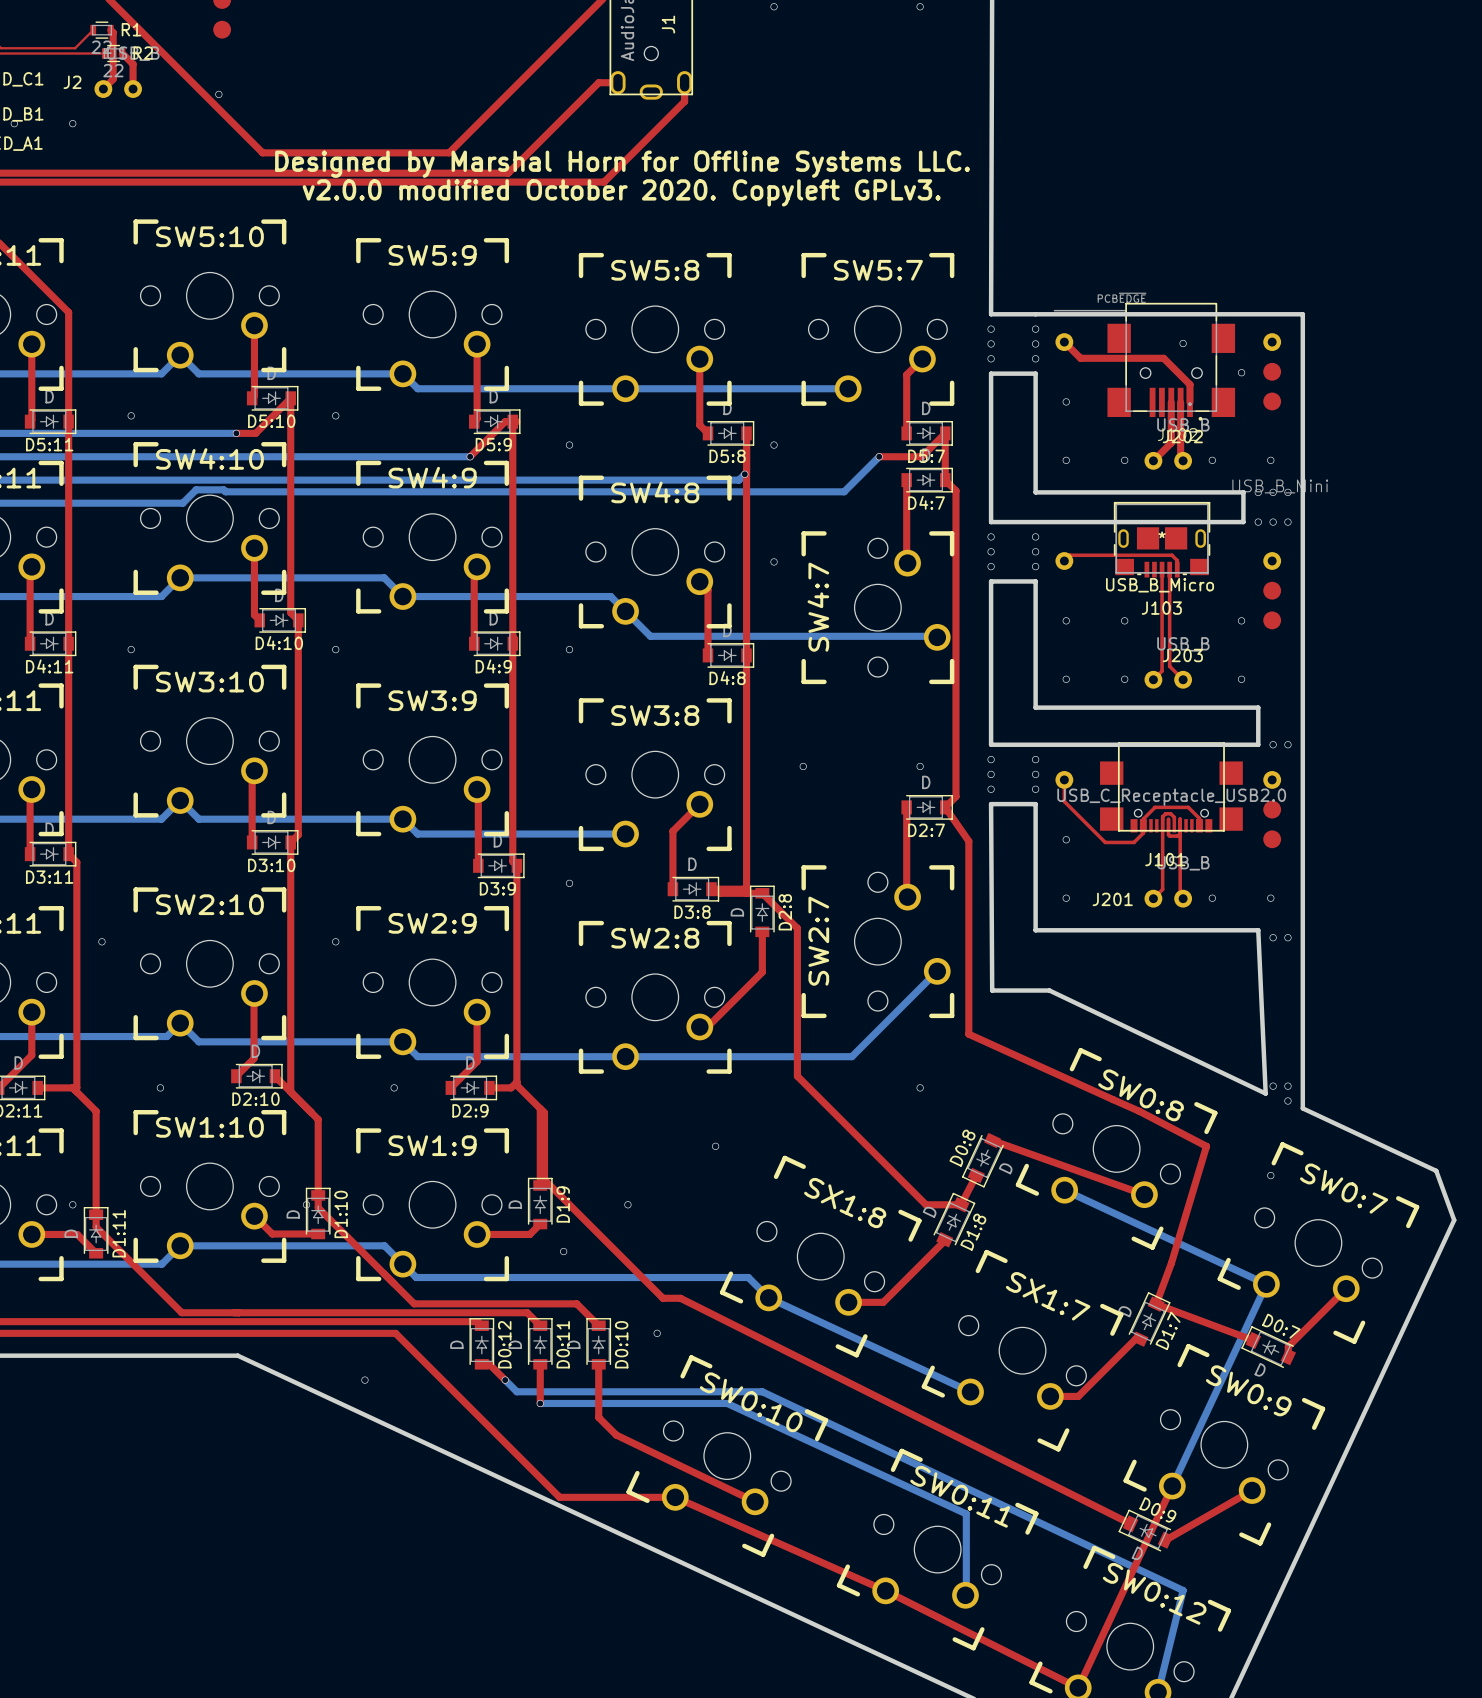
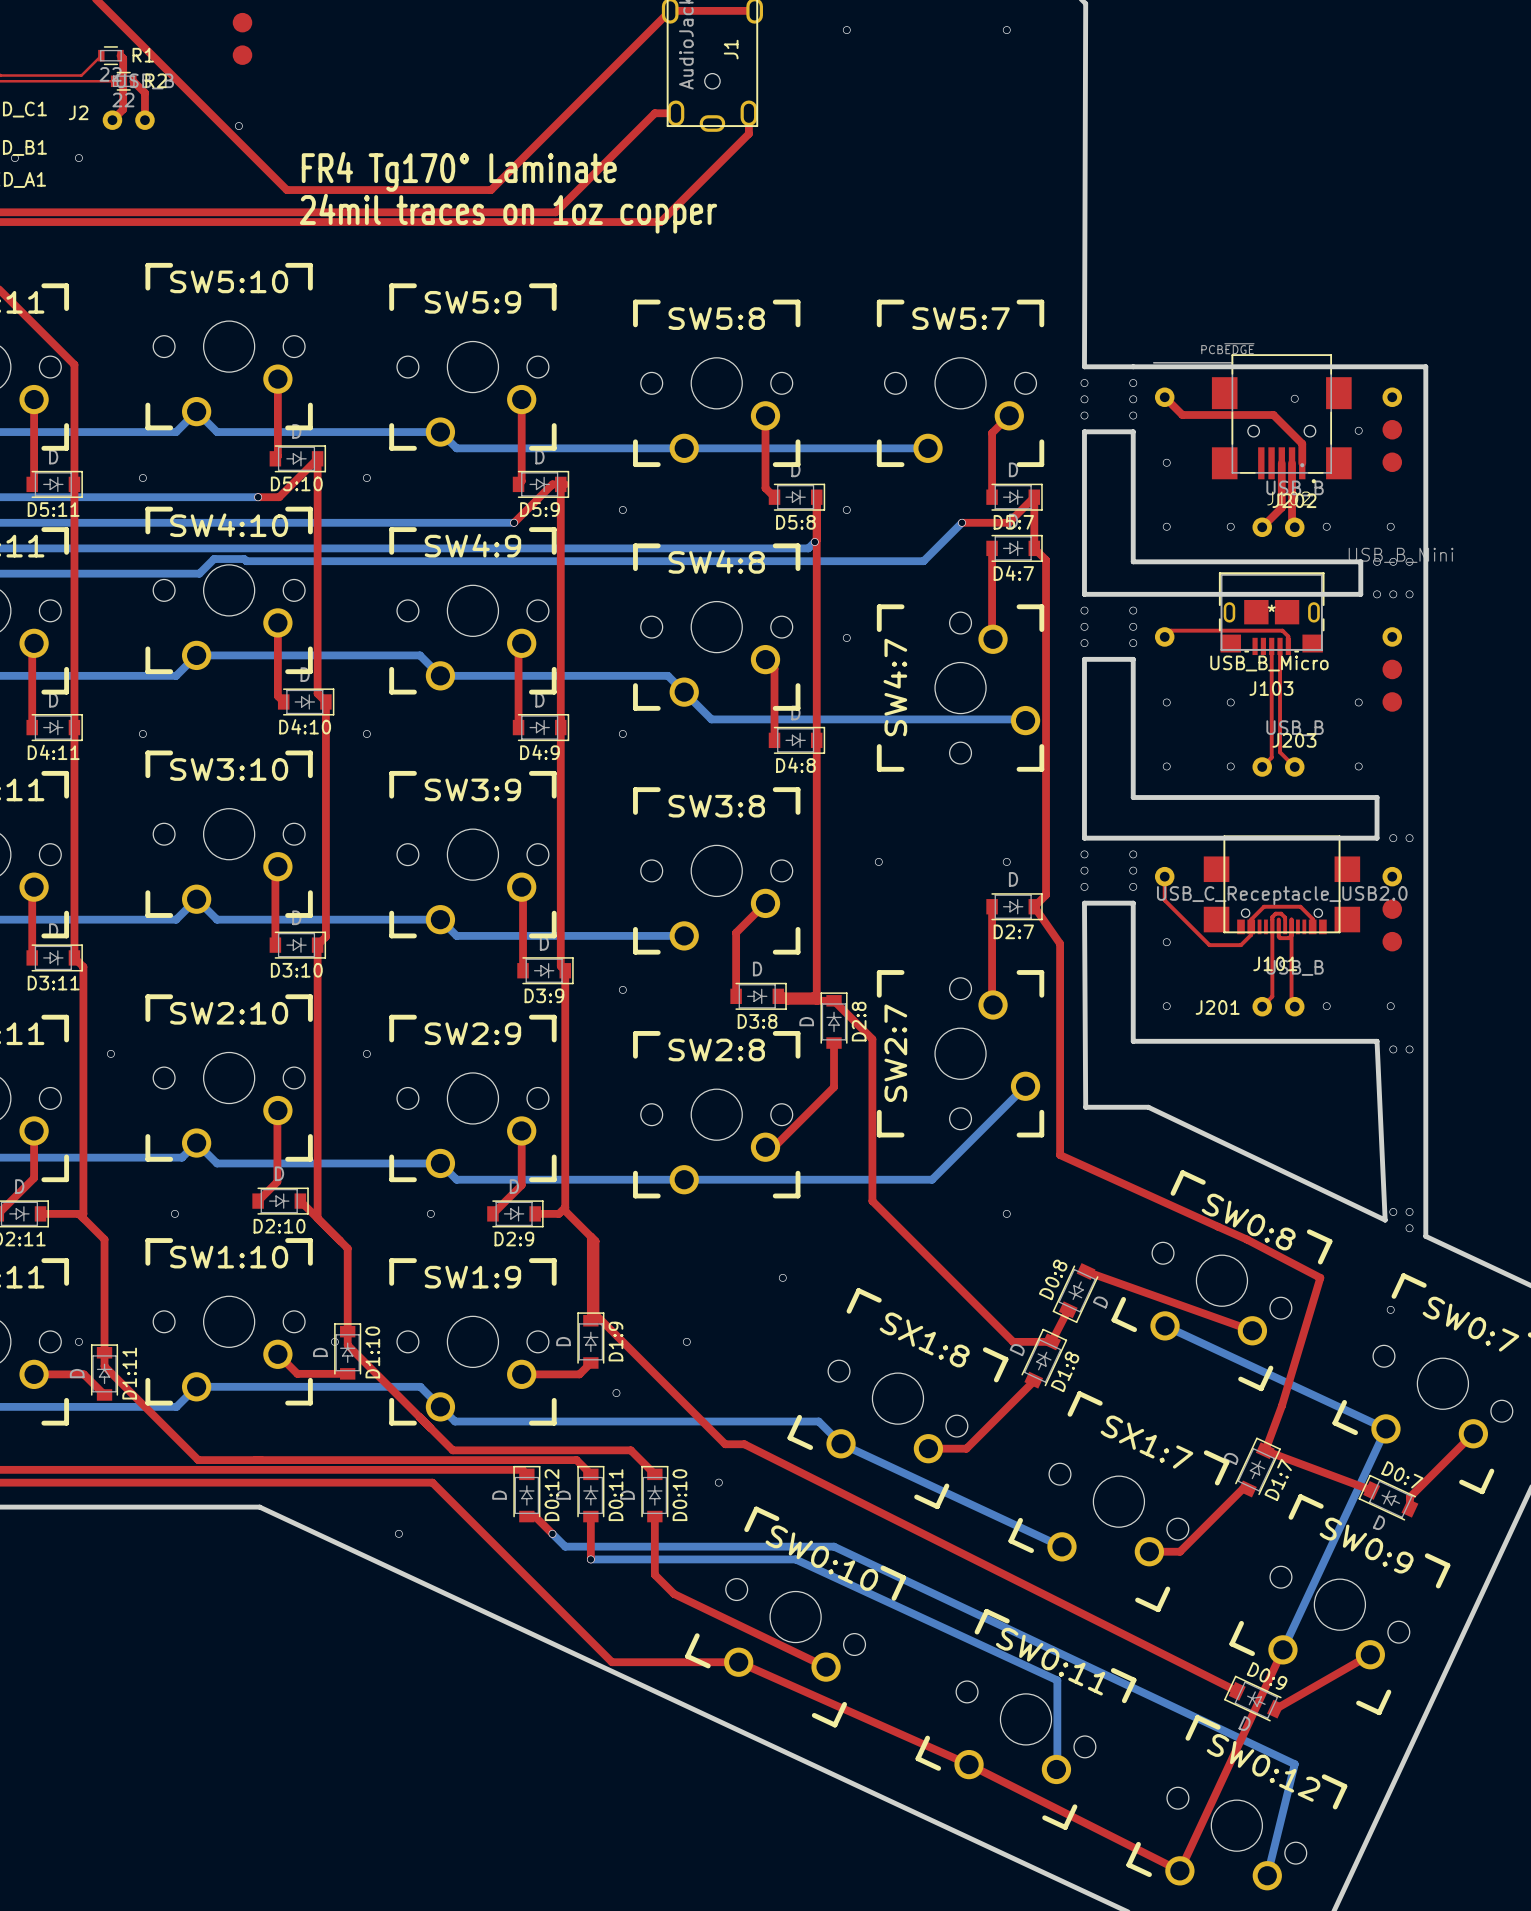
text: none -> FR4 Tg170° Laminate (459, 171)
text: Designed by Marshal Horn for Offline Systems LLC. (622, 164) -> none
text: none -> 24mil traces on 1oz copper (508, 213)
text: v2.0.0 modified October 2020. Copyleft GPLv3. (621, 192) -> none

